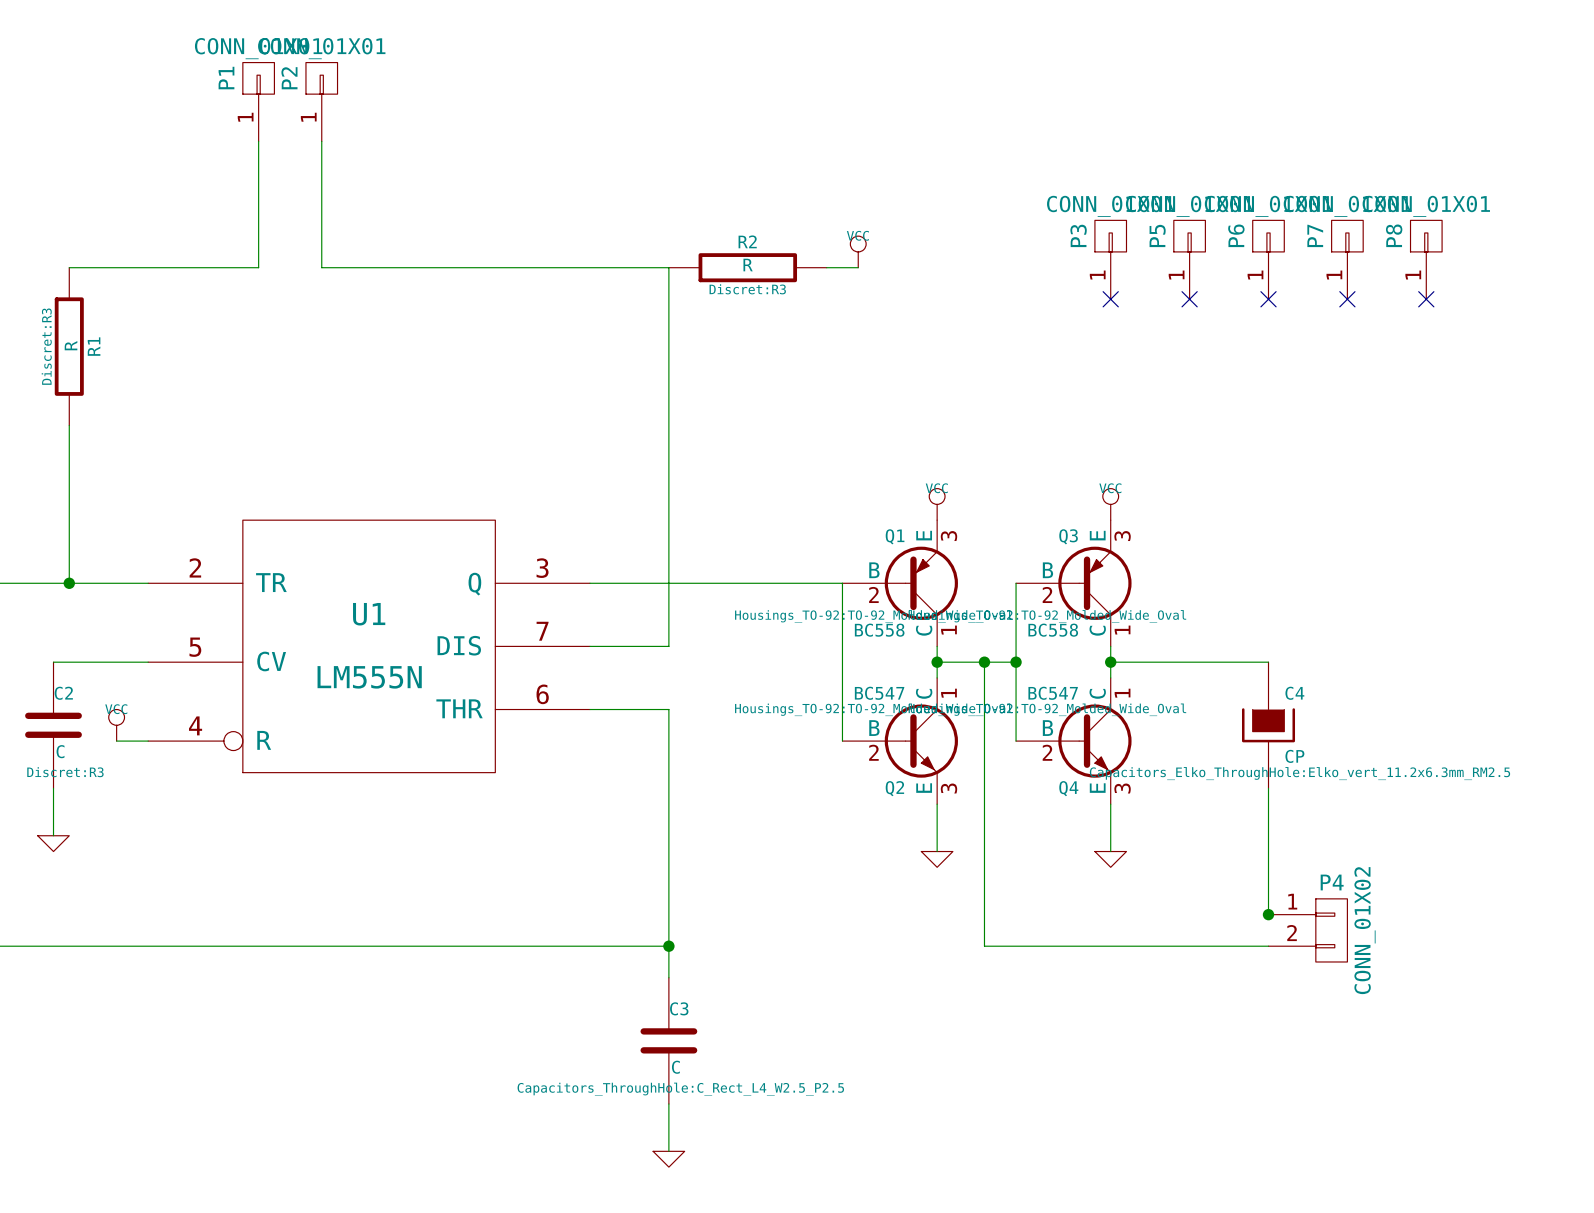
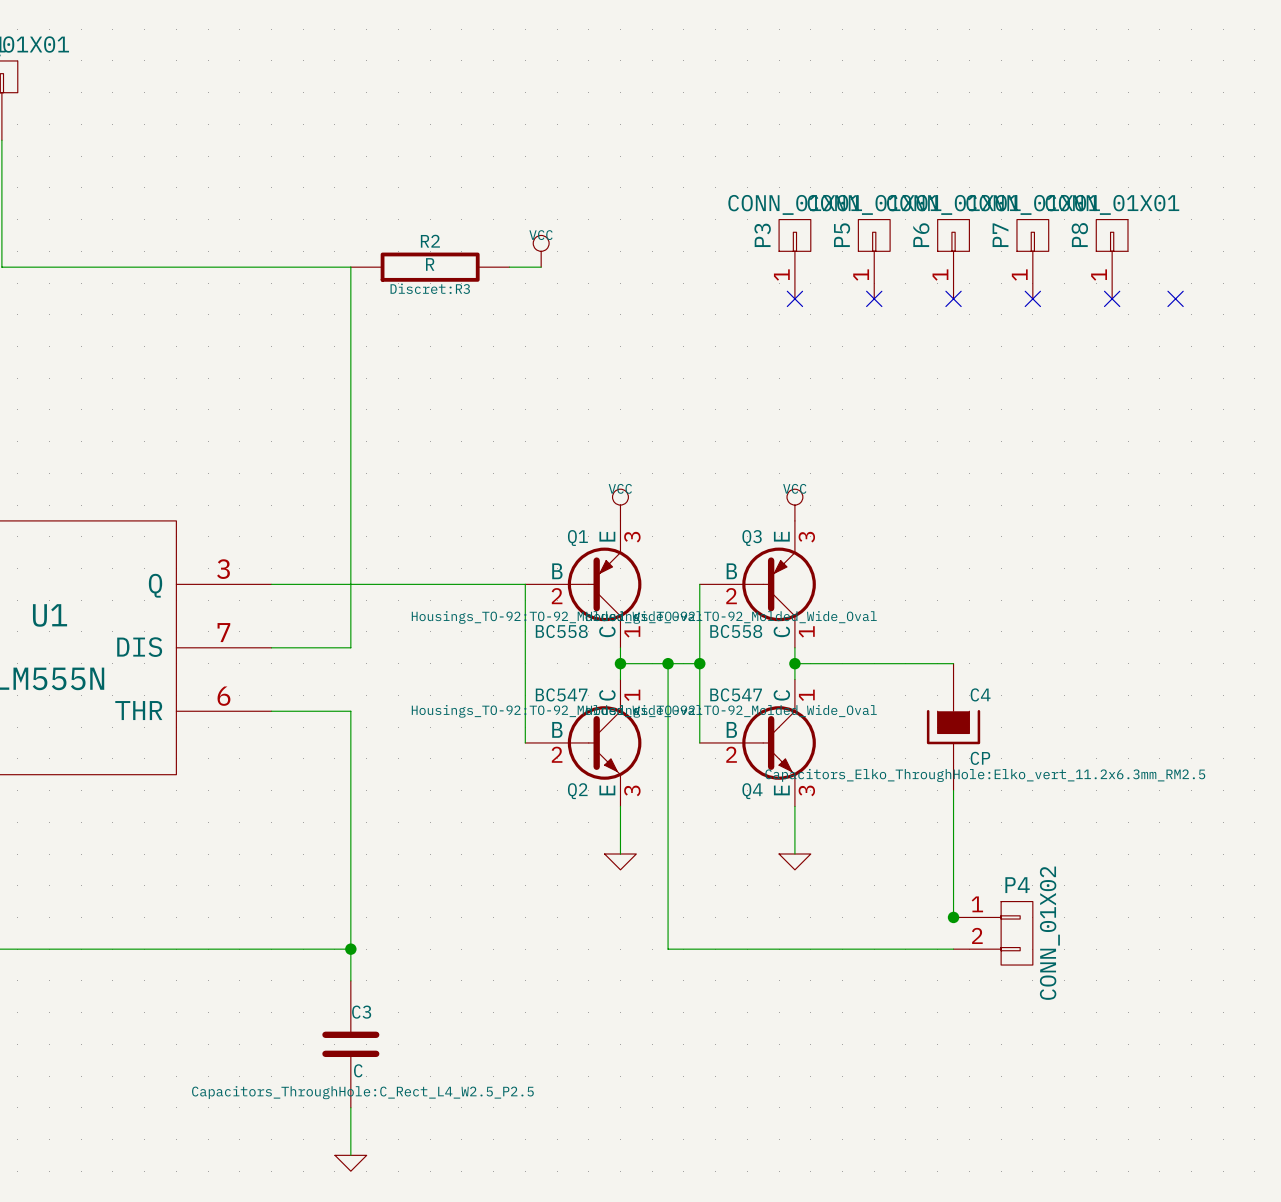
no-connect mark: none -> (1175, 298)

